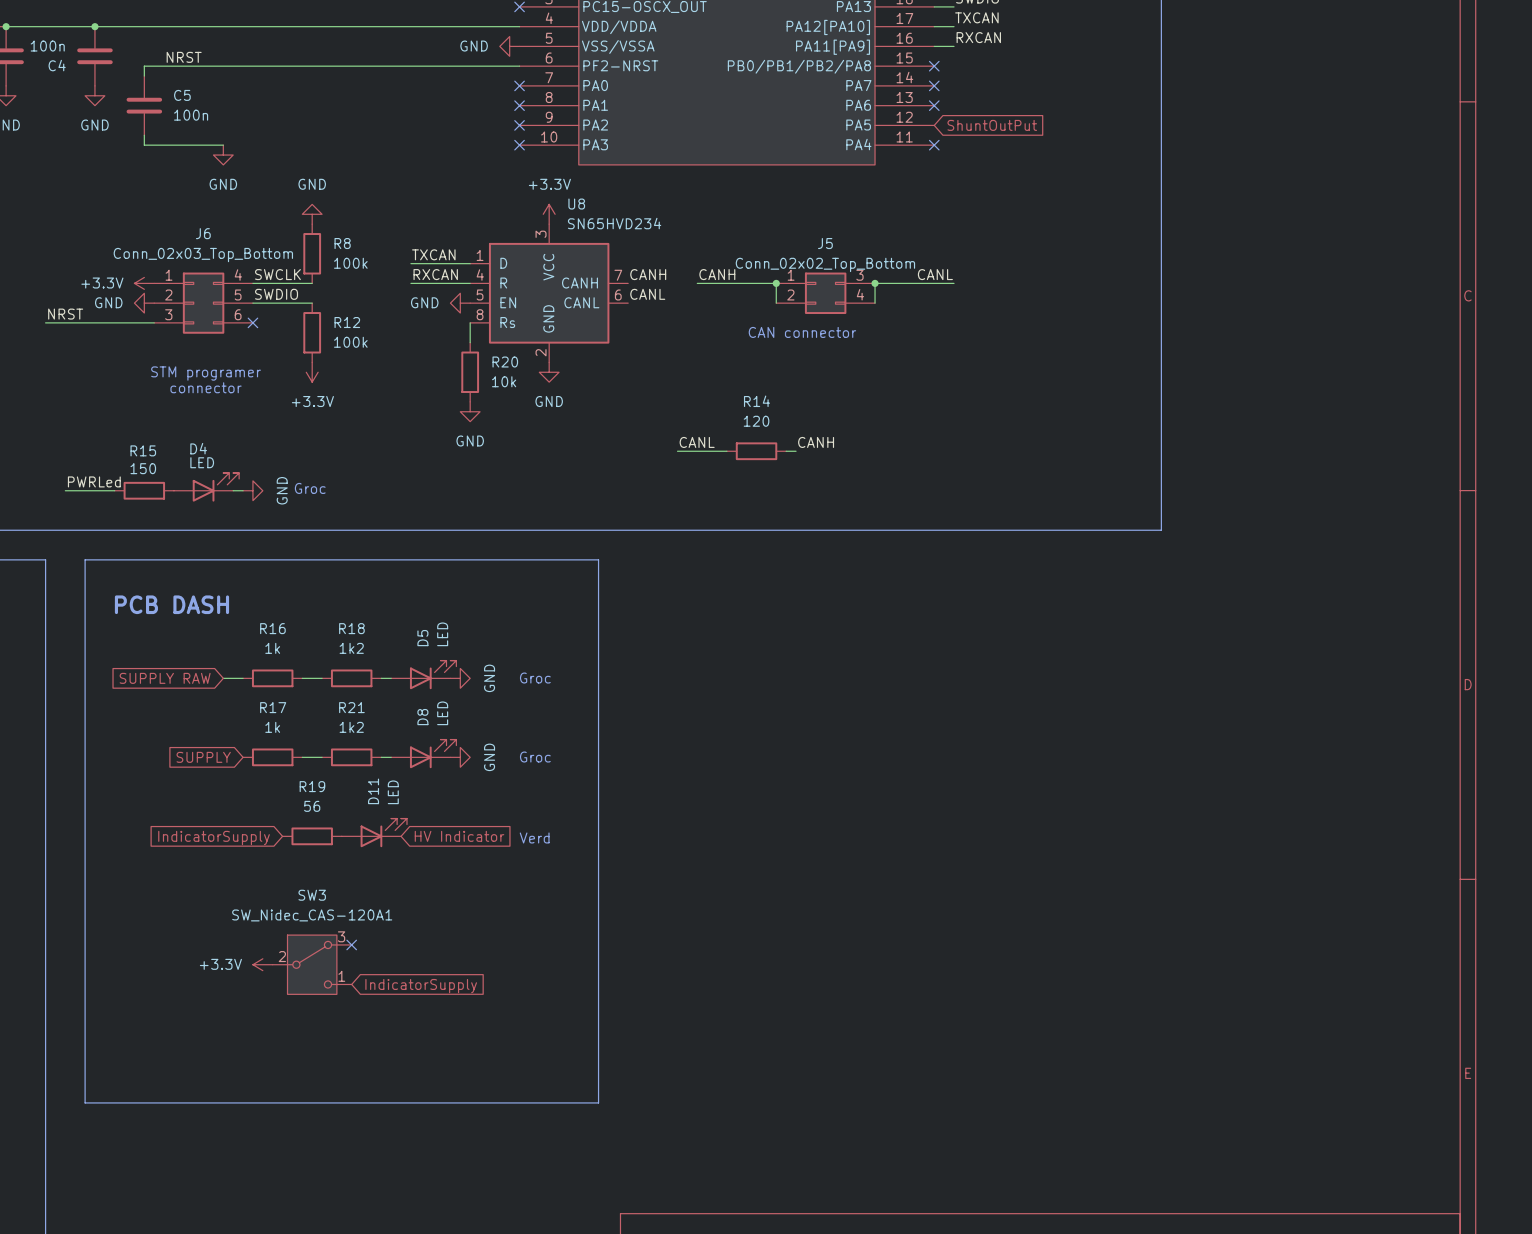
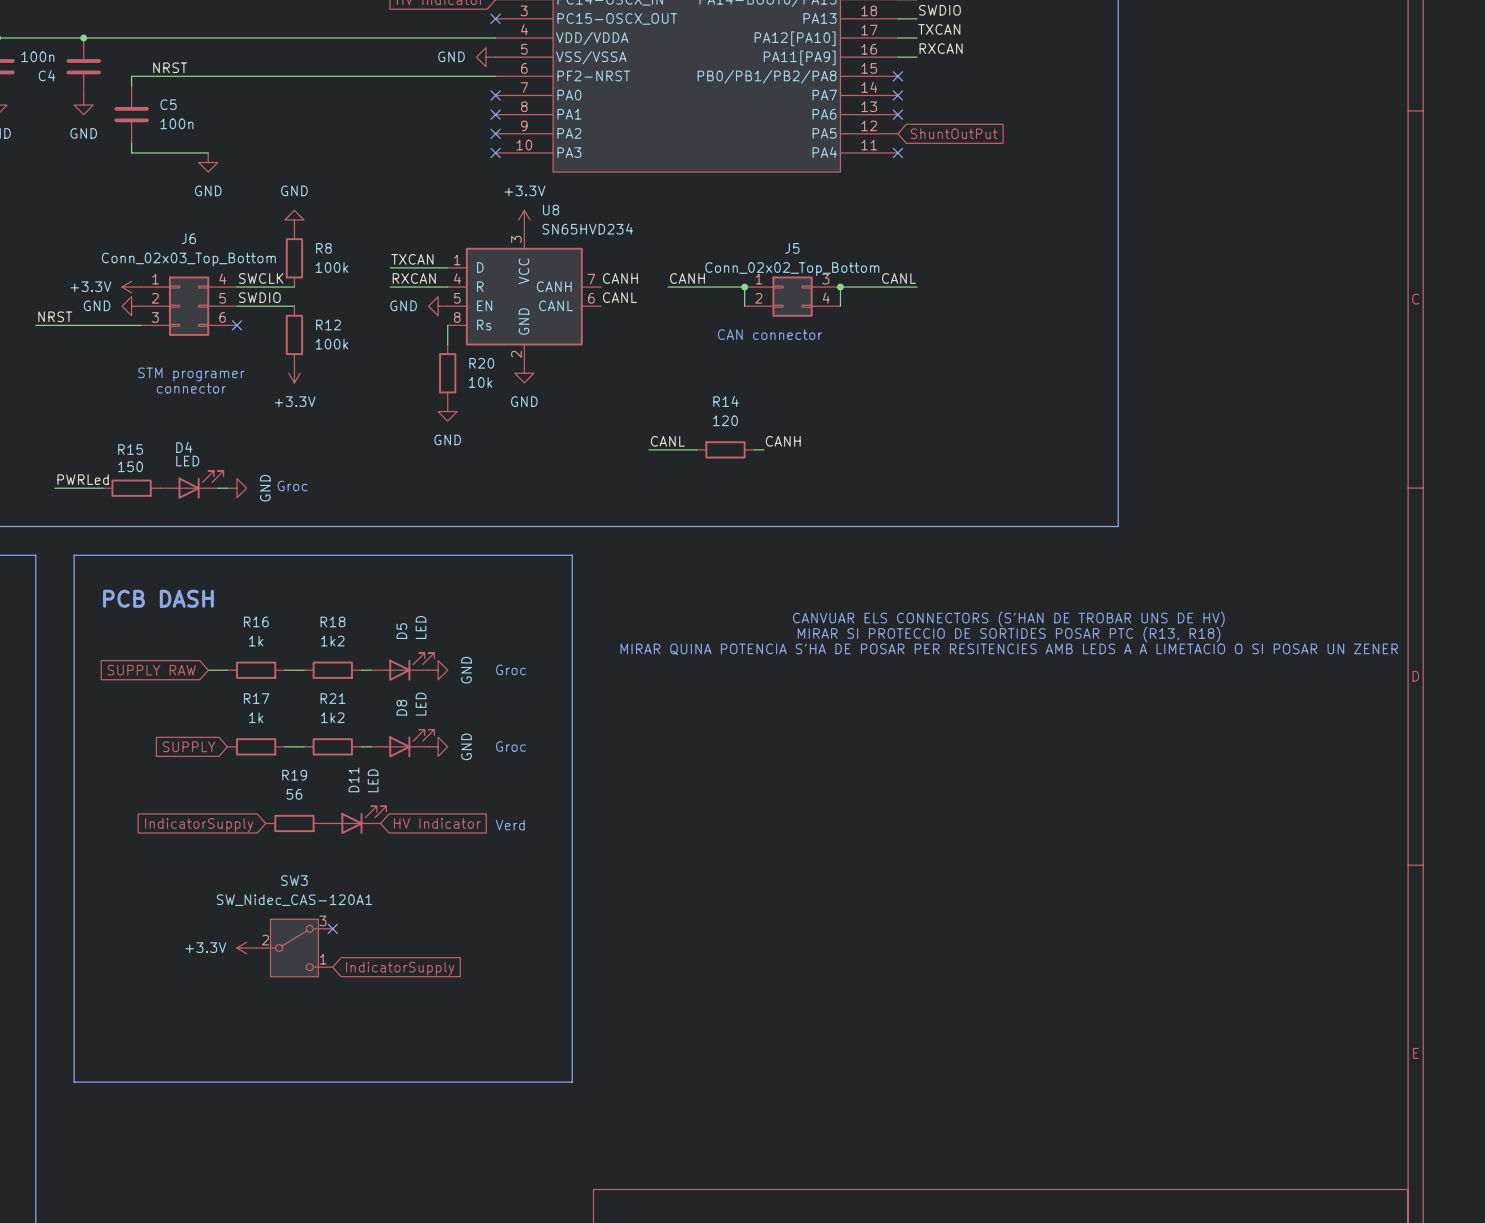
text: none -> CANVUAR ELS CONNECTORS (S'HAN DE TROBAR UNS DE HV) (1008, 619)
text: none -> MIRAR SI PROTECCIO DE SORTIDES POSAR PTC (R13, R18) (1009, 634)
text: none -> MIRAR QUINA POTENCIA S'HA DE POSAR PER RESITENCIES AMB LEDS A A LIMETACIO O SI POSAR UN ZENER (1009, 649)

